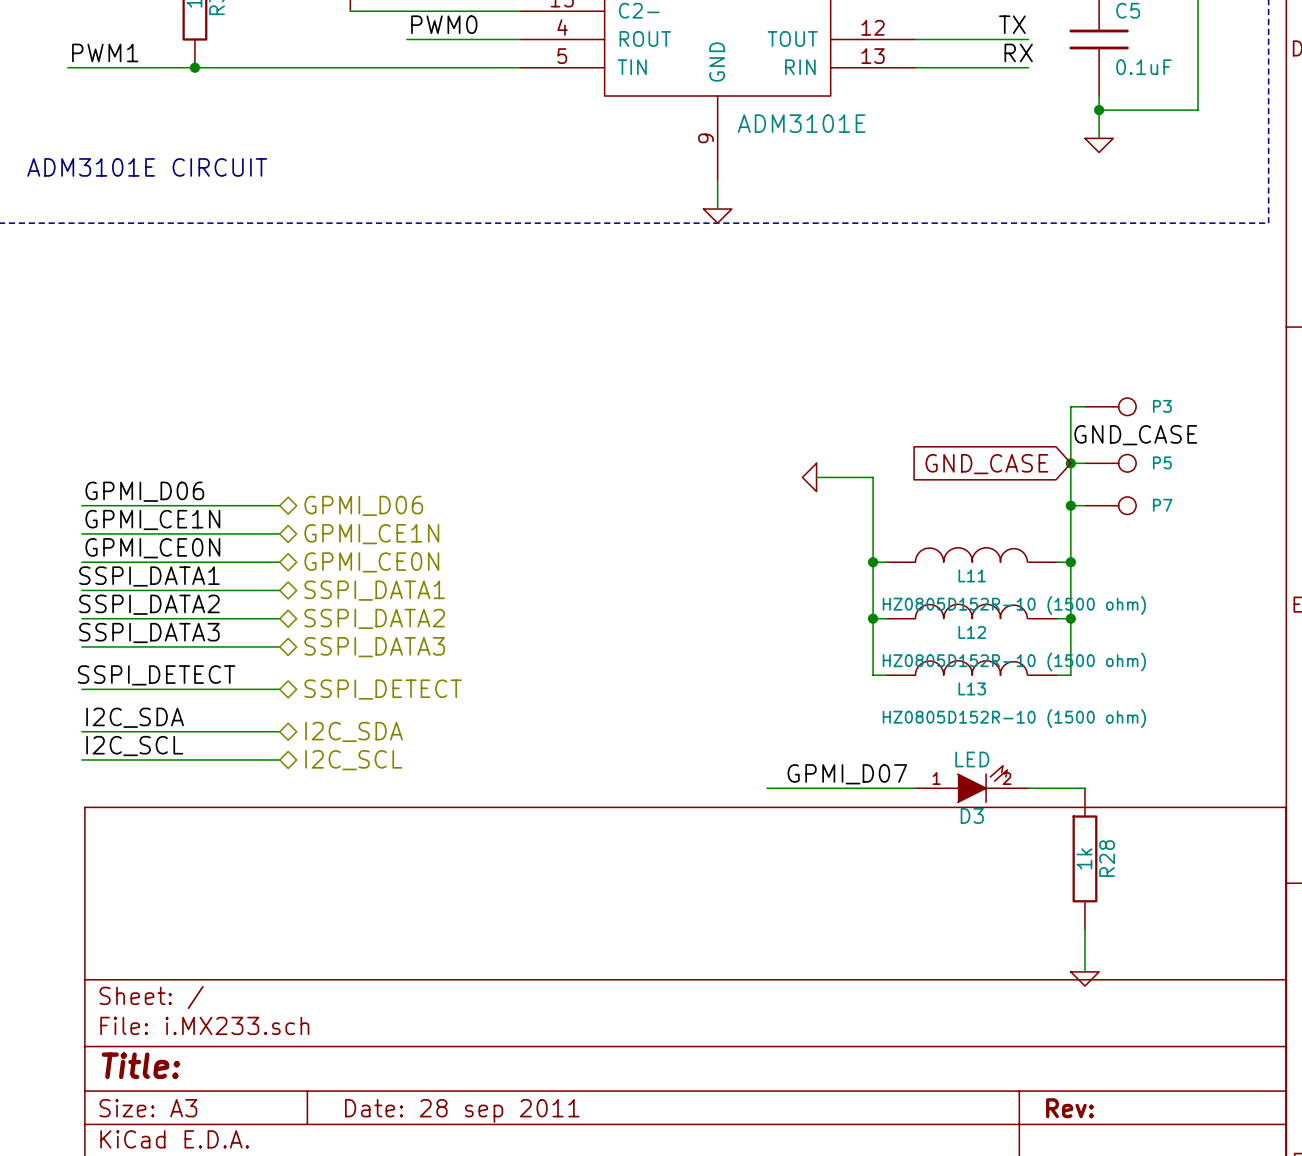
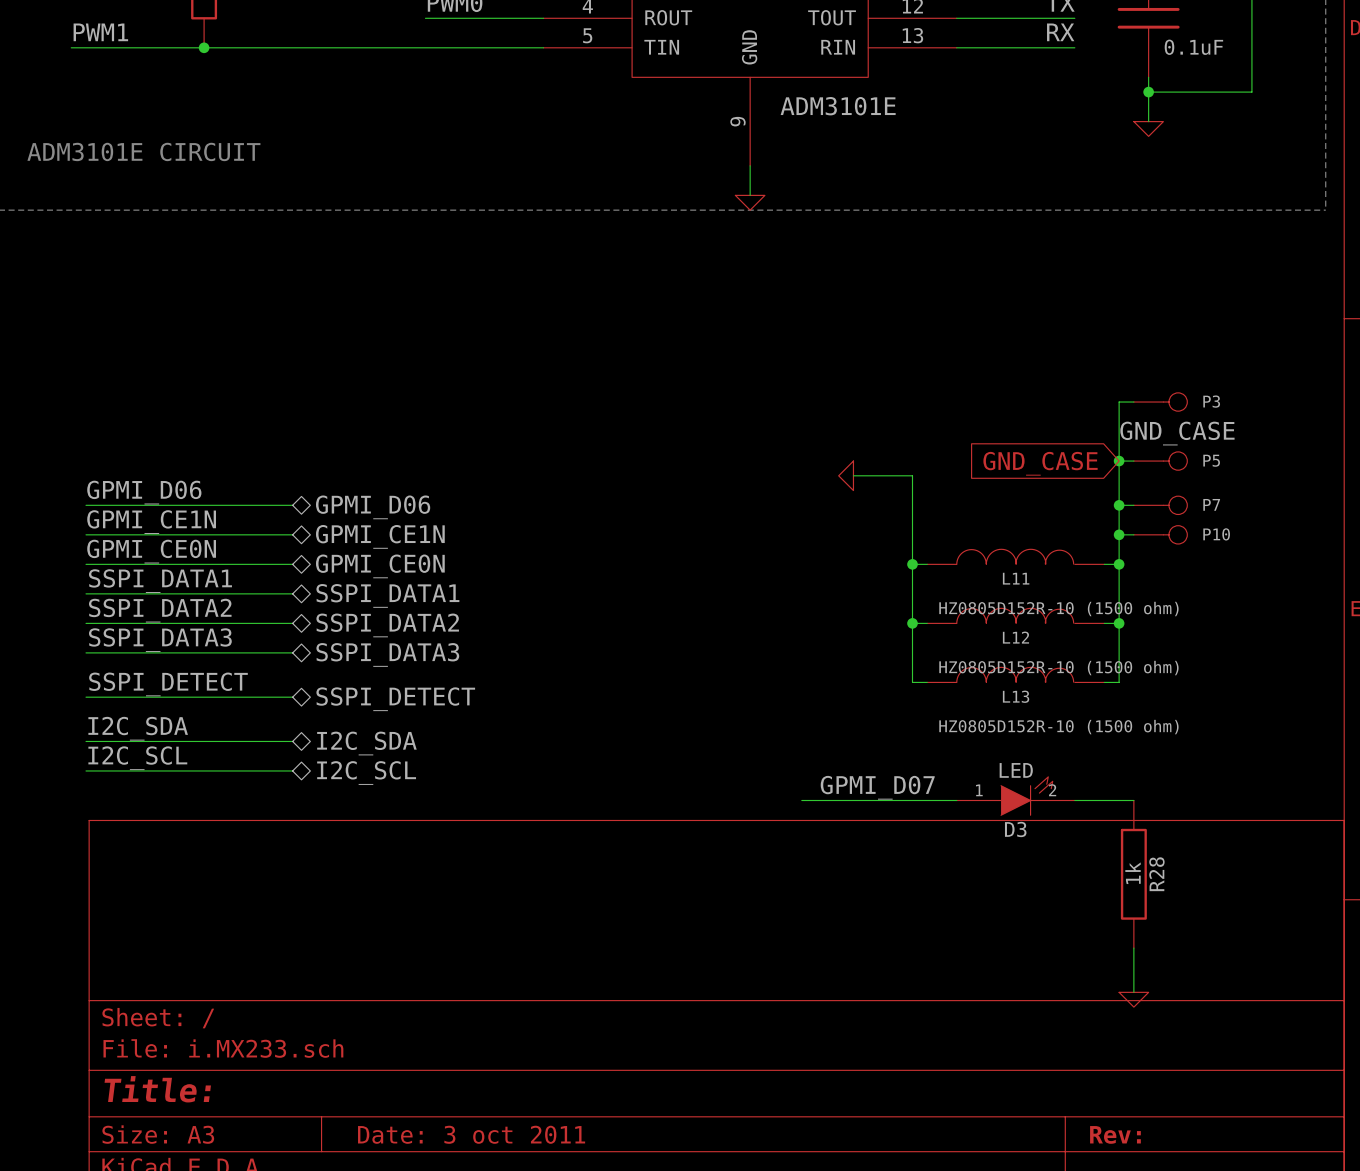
wire: none -> (1119, 534) (1133, 534)
junction: none -> (1119, 534)
P10: none -> (1160, 534)
title block: Date: 28 sep 2011 (462, 1111) -> Date: 3 oct 2011 (471, 1134)

